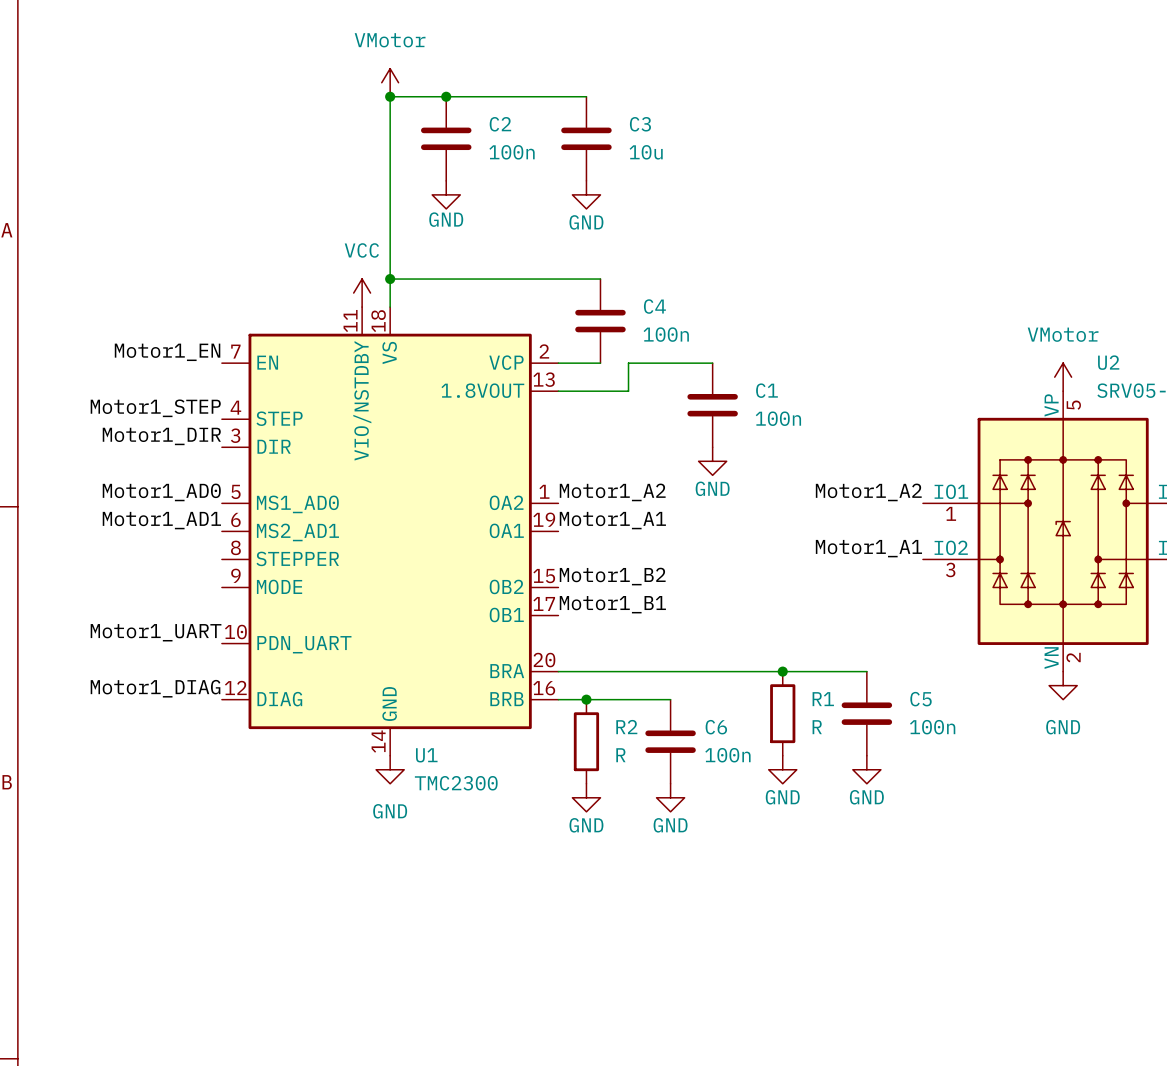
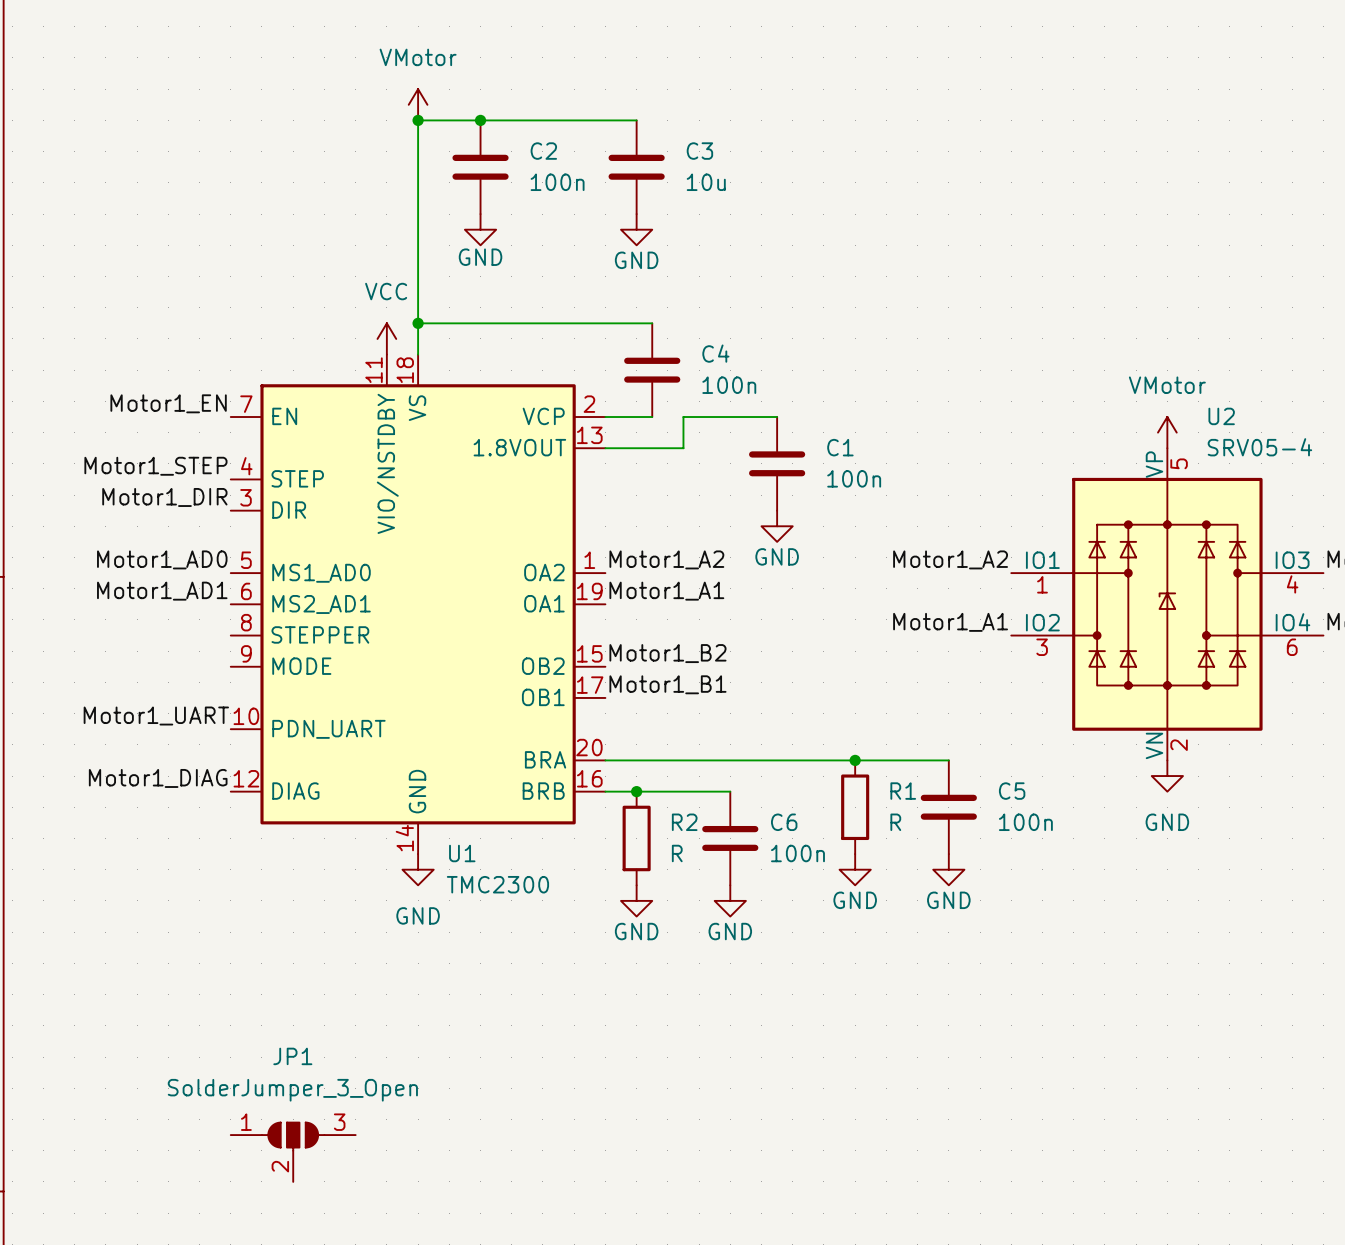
JP1: none -> SolderJumper_3_Open (293, 1152)

